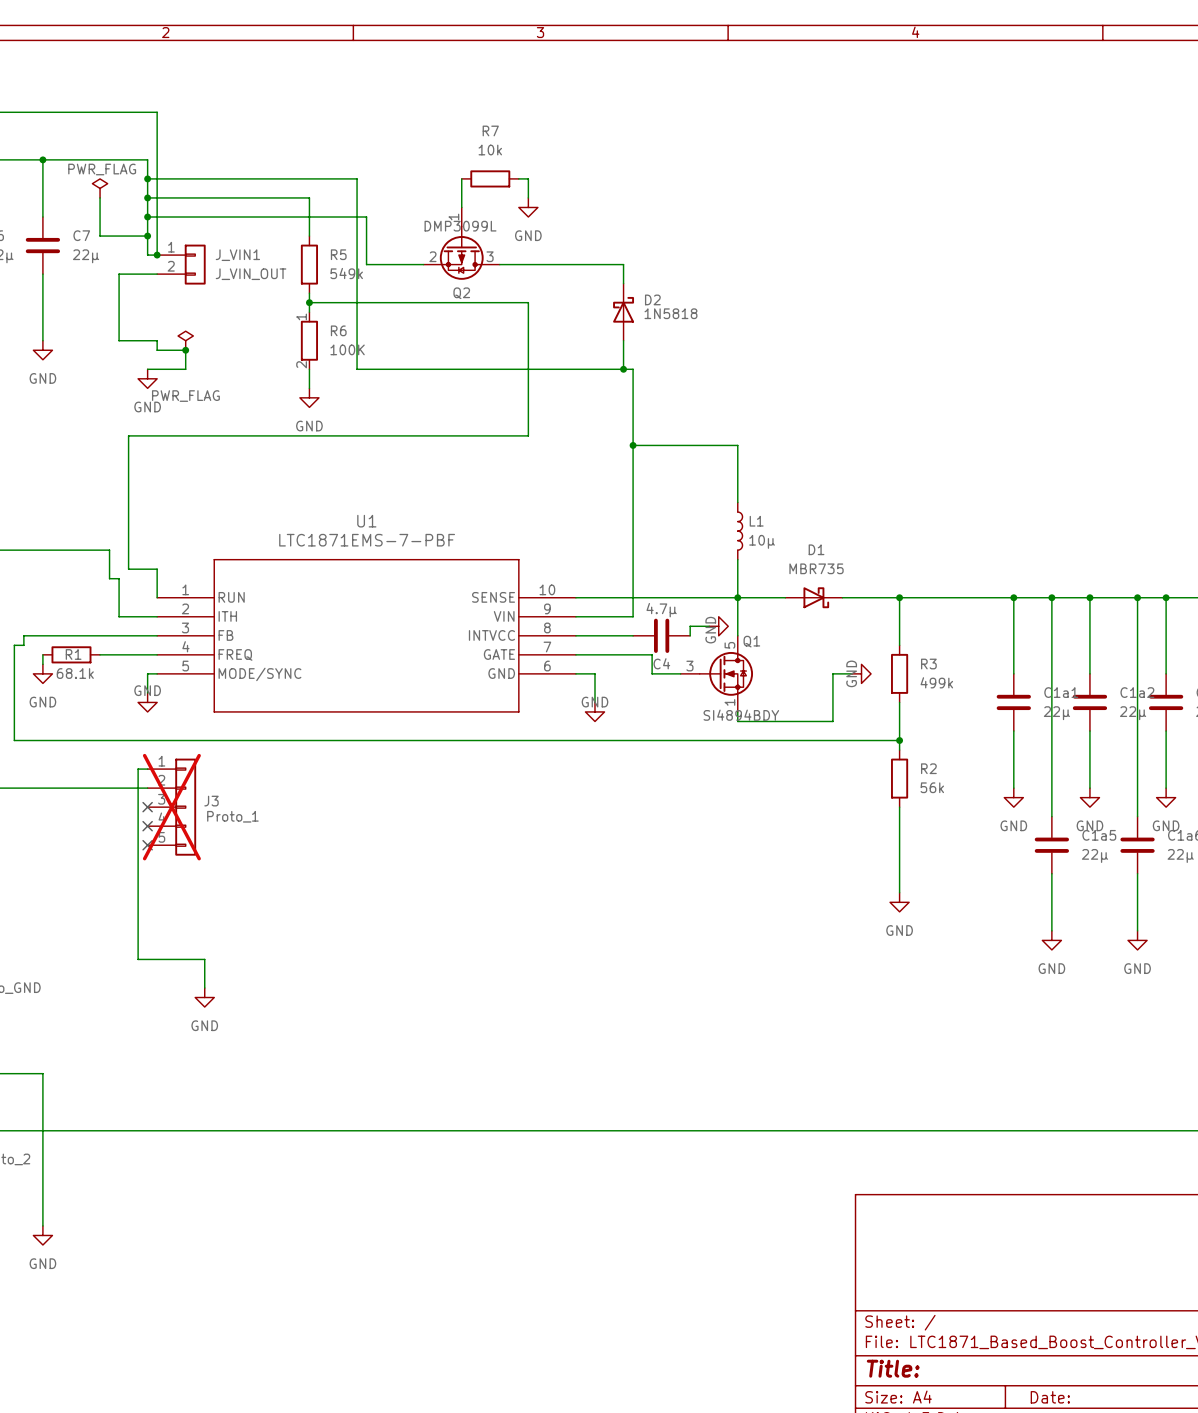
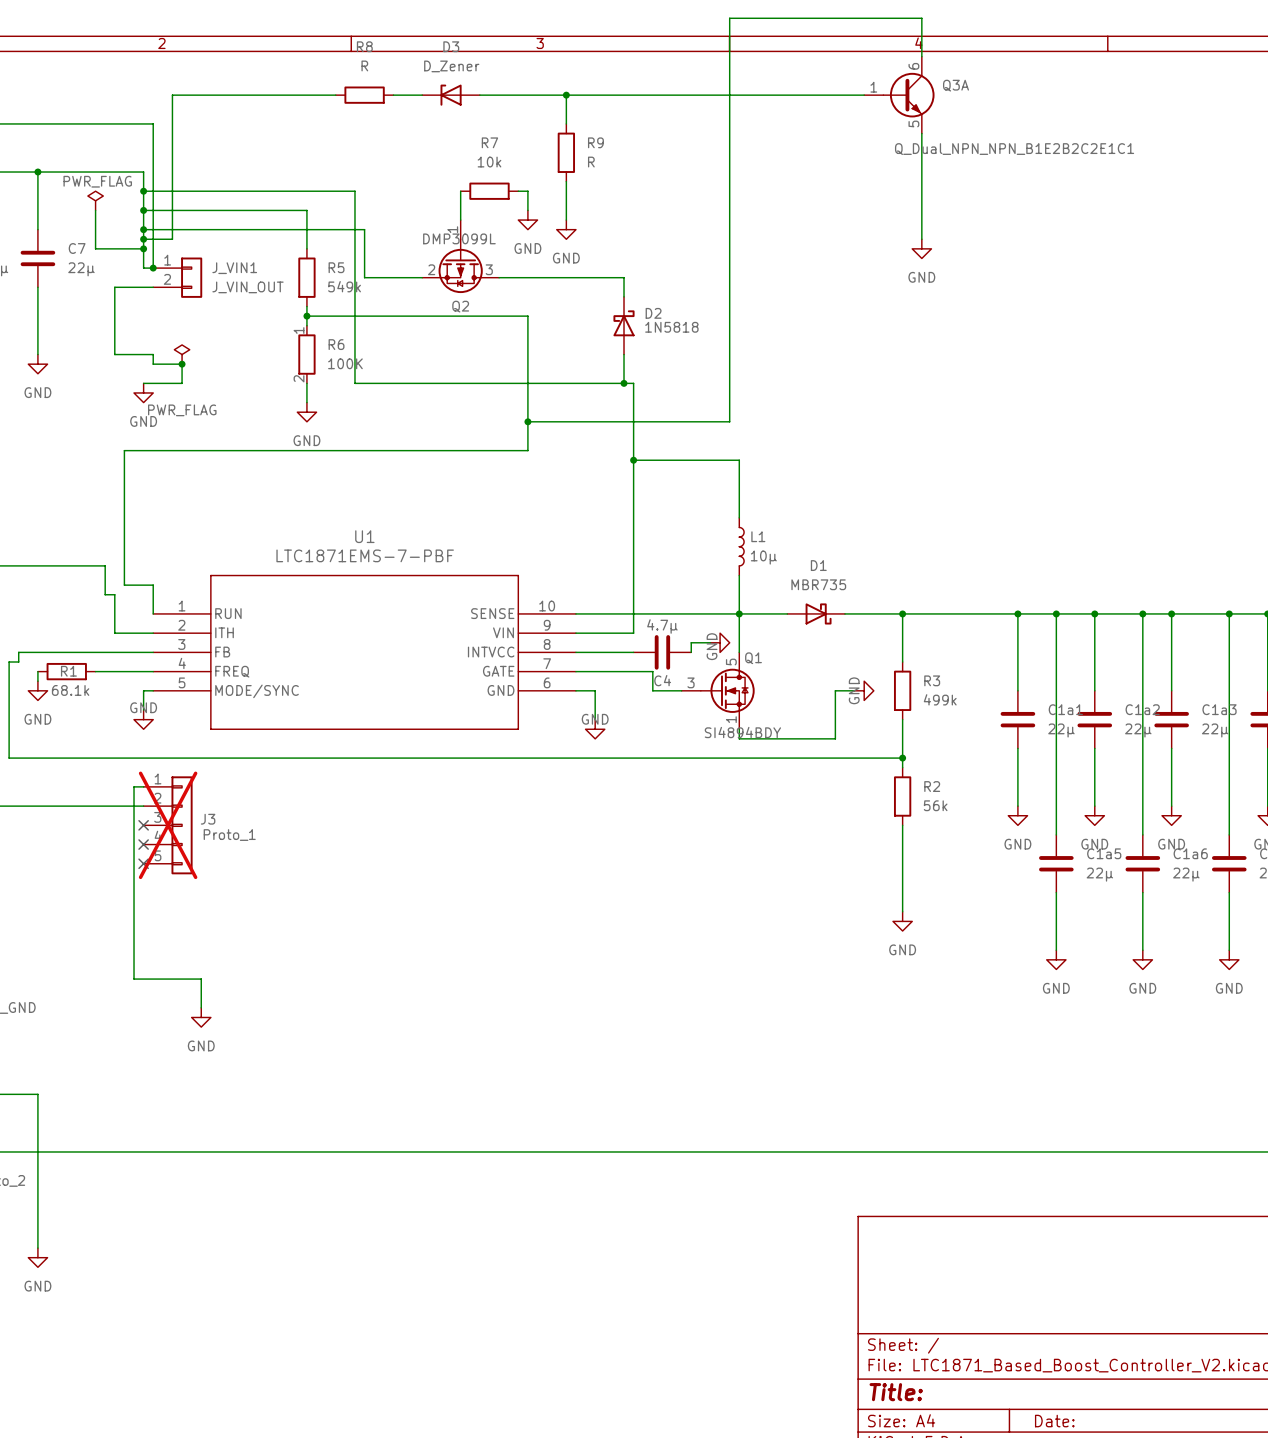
wire: none -> (921, 56) (921, 18) (729, 18) (729, 421) (527, 421)
wire: none -> (335, 95) (172, 95) (172, 239) (143, 239)
R8: none -> R (364, 95)
wire: none -> (393, 95) (422, 95)
D3: none -> D_Zener (451, 95)
wire: none -> (479, 95) (864, 95)
wire: none -> (566, 95) (566, 123)
junction: none -> (566, 95)
Q3A: none -> Q_Dual_NPN_NPN_B1E2B2C2E1C1 (899, 95)
wire: none -> (921, 133) (921, 239)
R9: none -> R (566, 152)
wire: none -> (566, 181) (566, 220)
power symbol: none -> GND (566, 229)
junction: none -> (143, 239)
power symbol: none -> GND (921, 248)
junction: none -> (527, 421)

